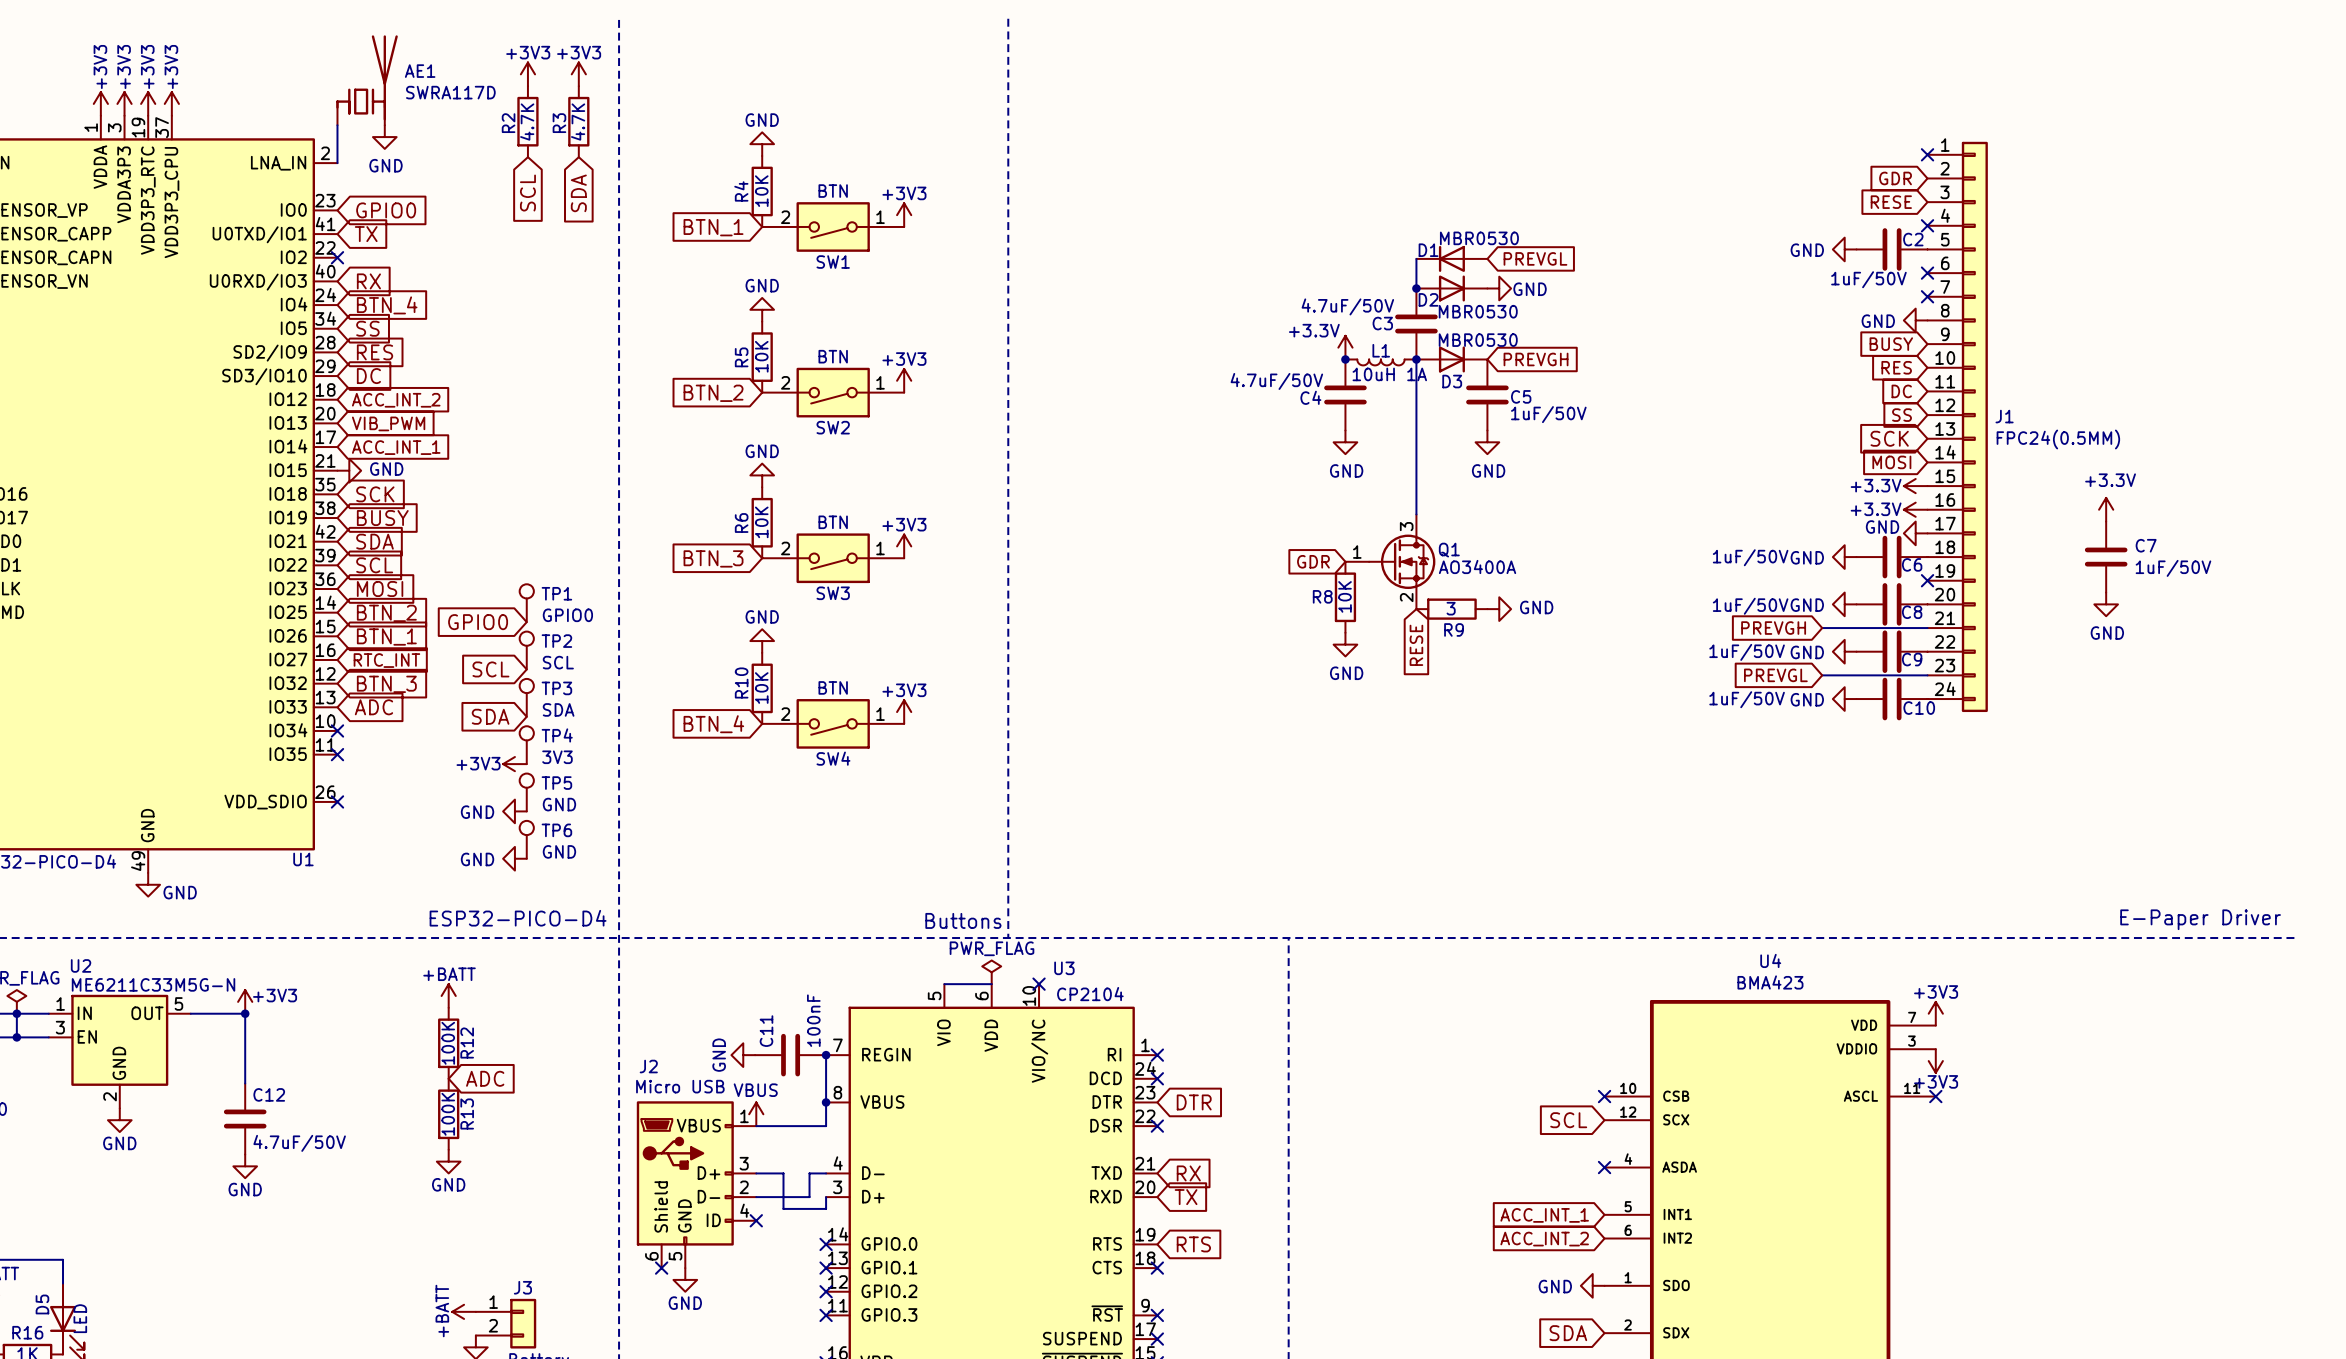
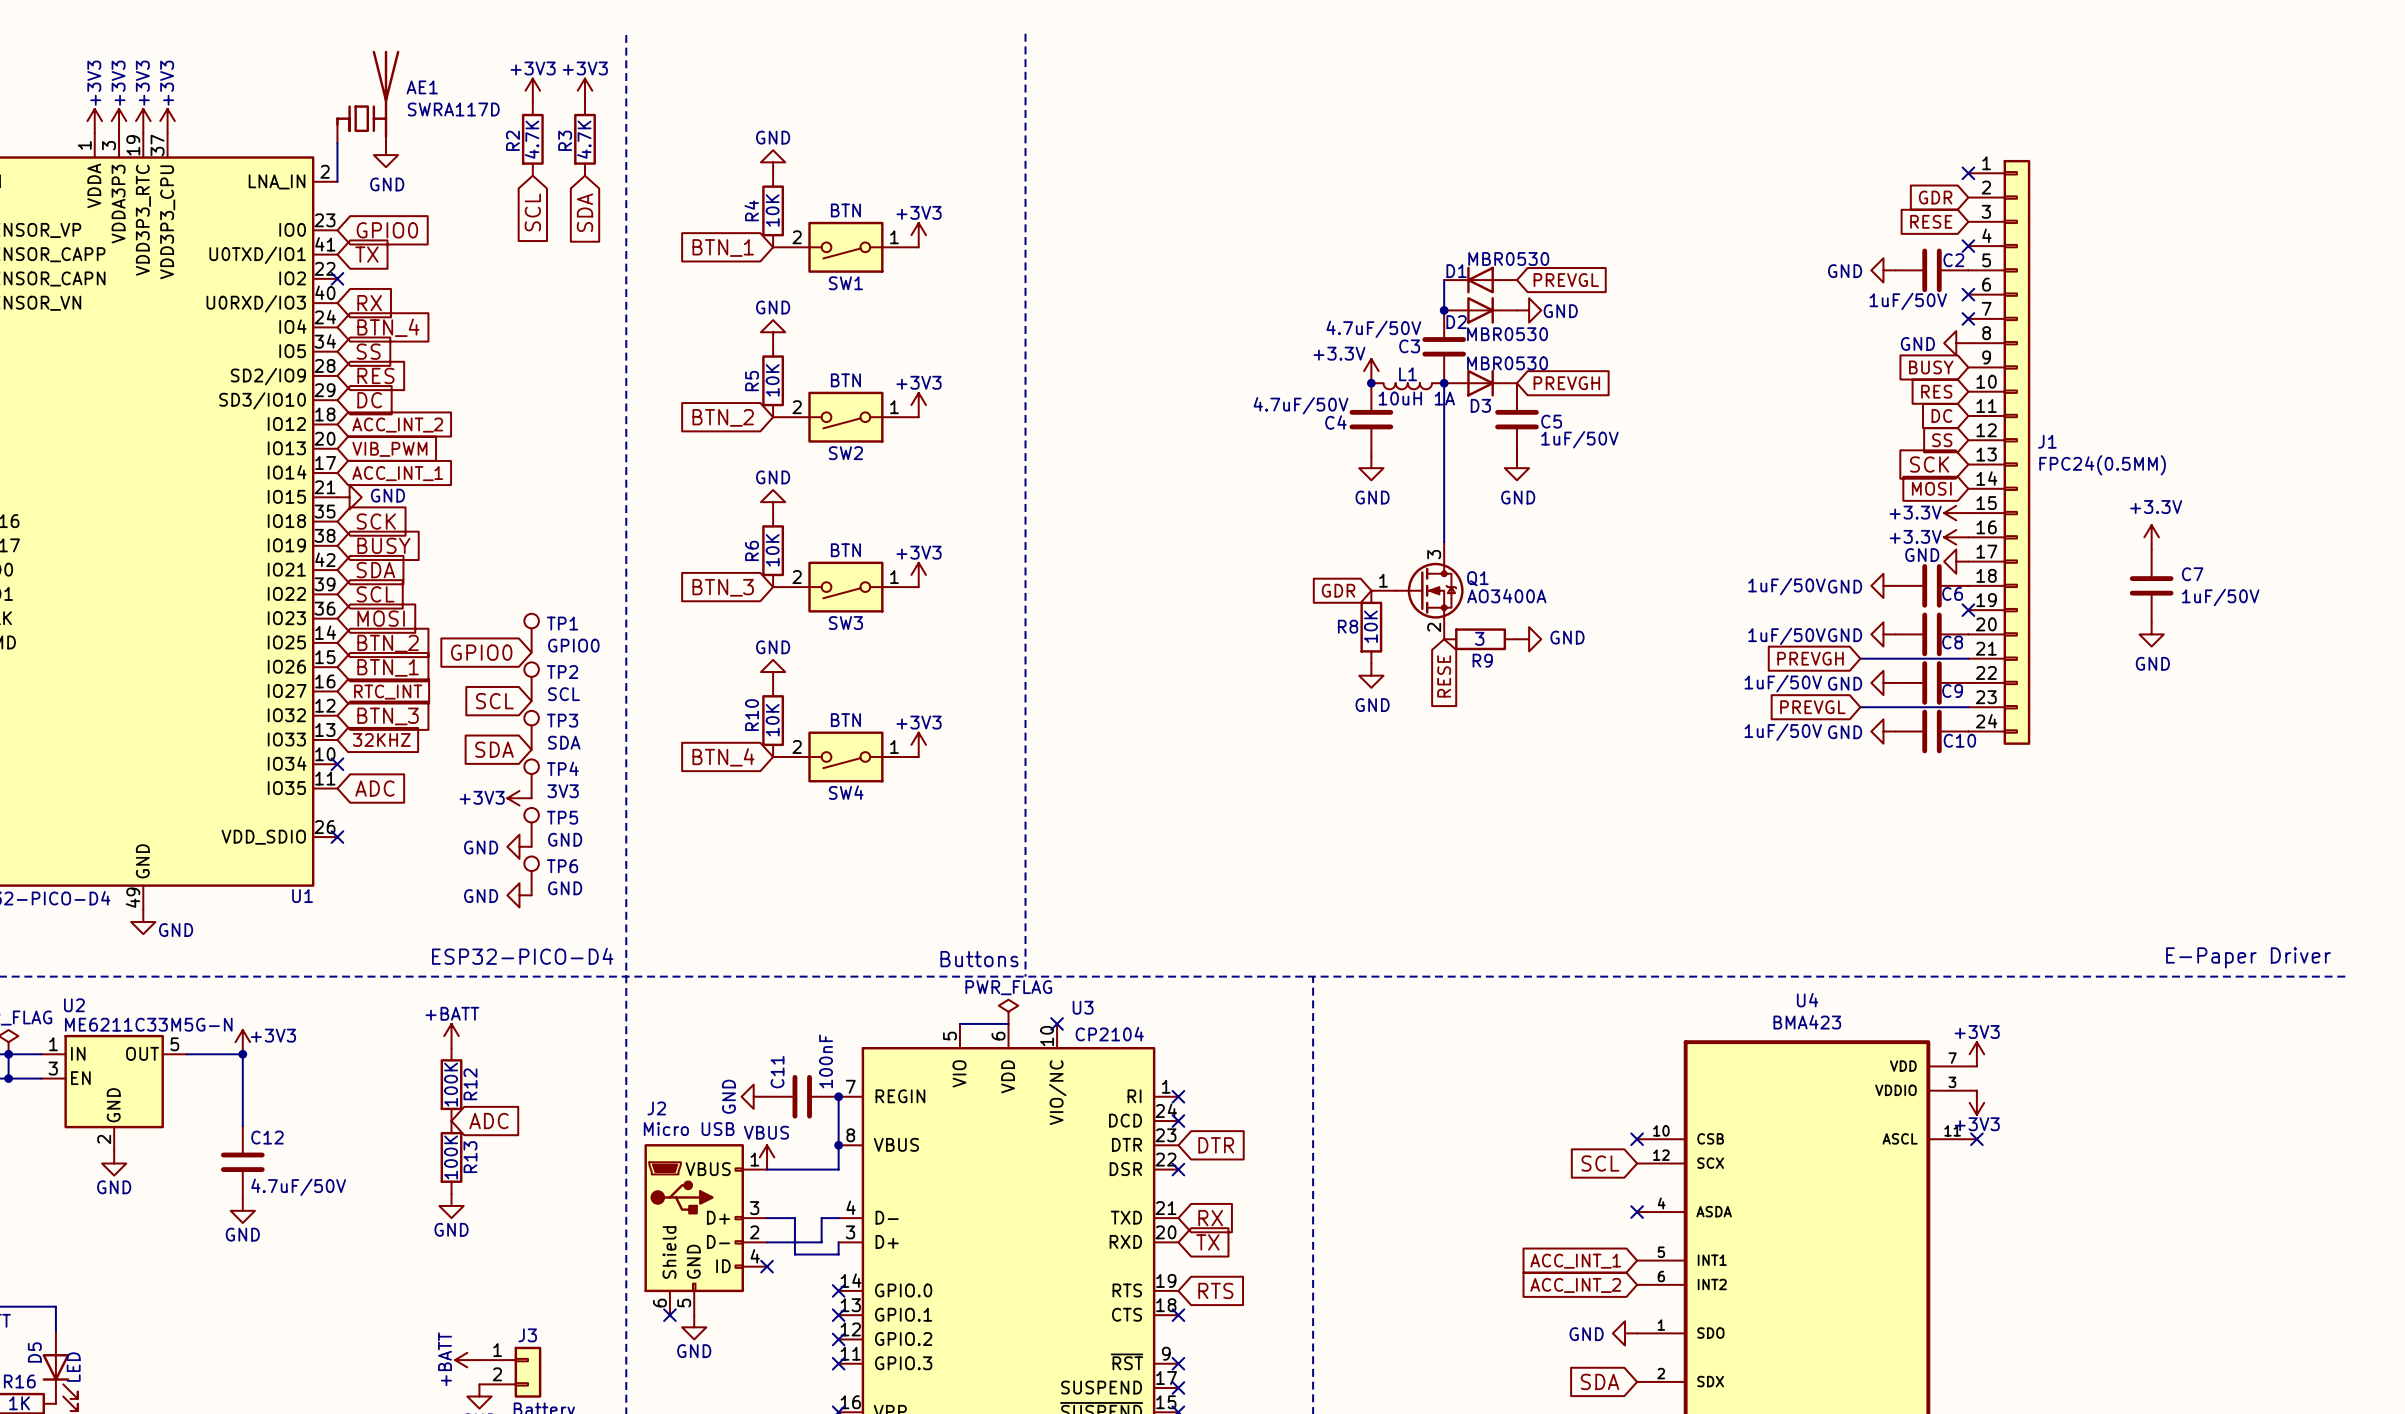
global label: ADC (373, 707) -> 32KHZ (381, 739)
no-connect mark: (337, 754) -> none
global label: none -> ADC (374, 788)

